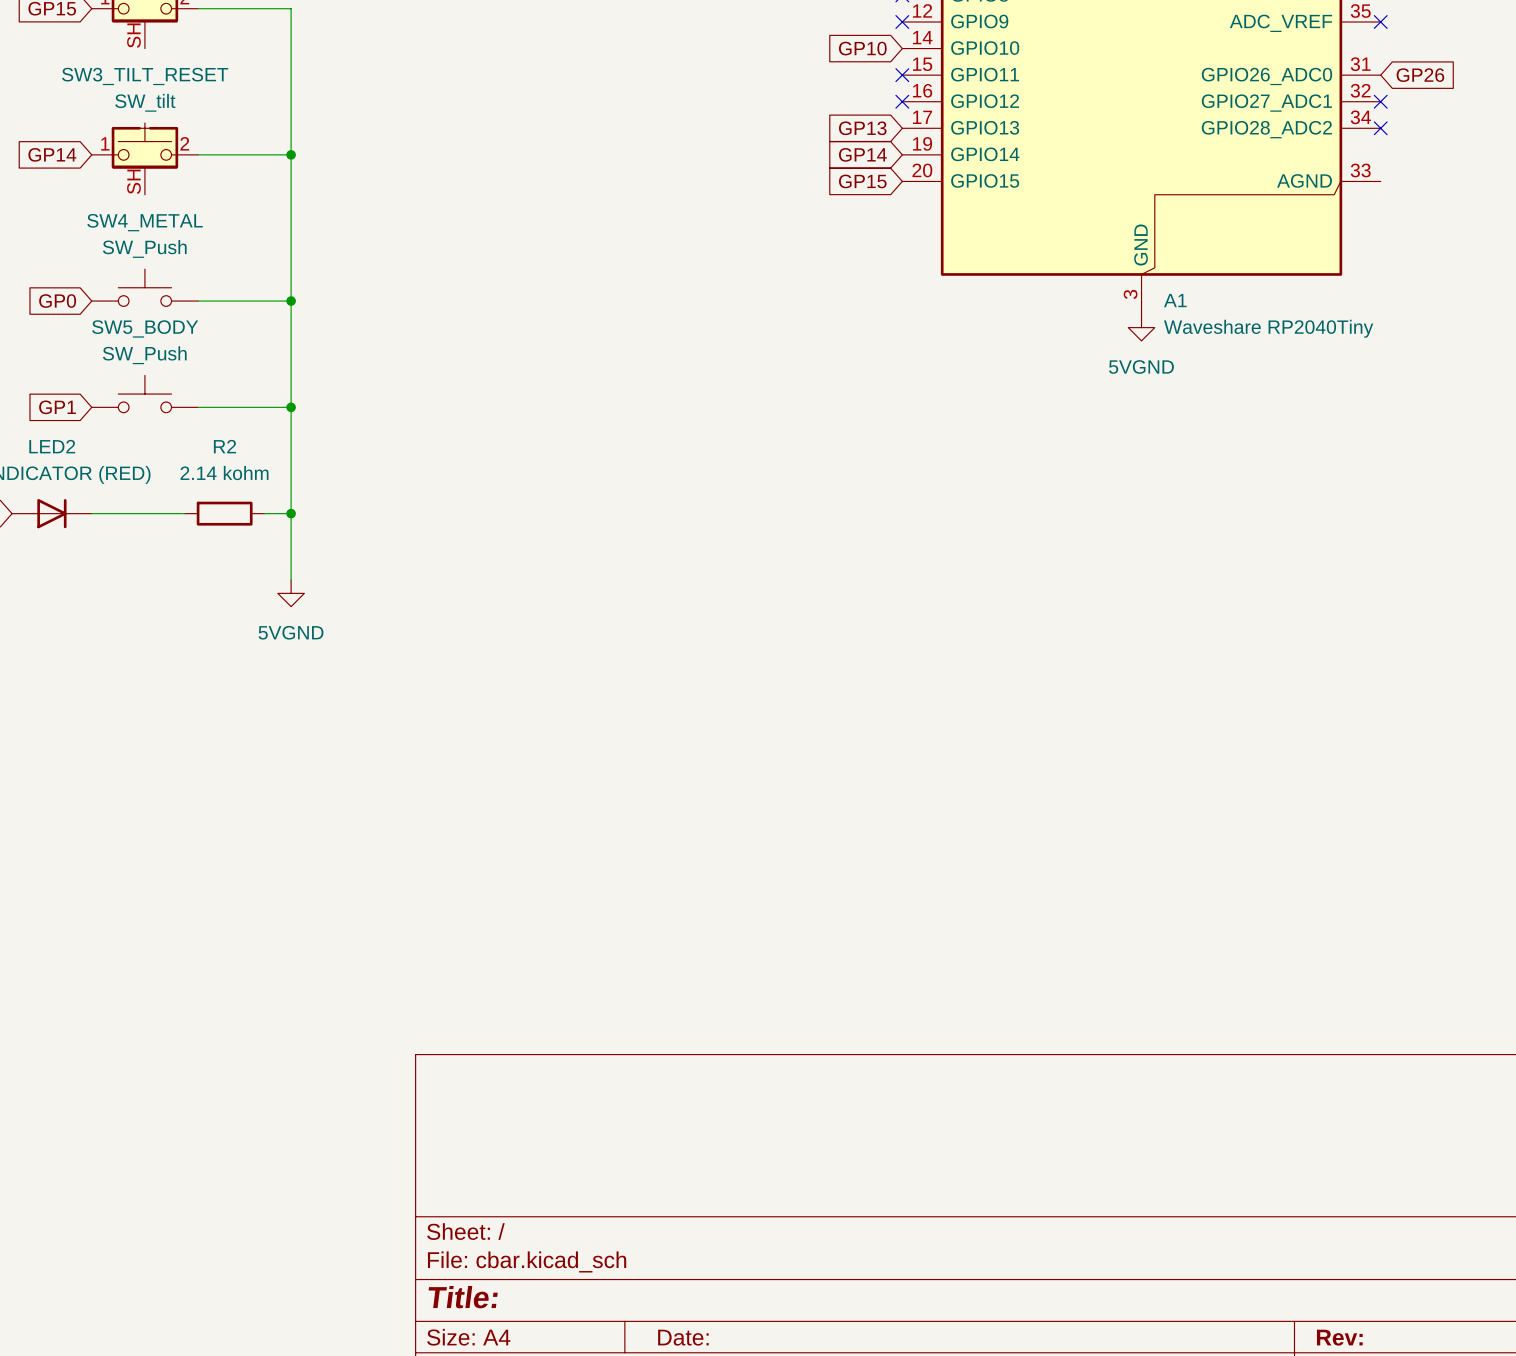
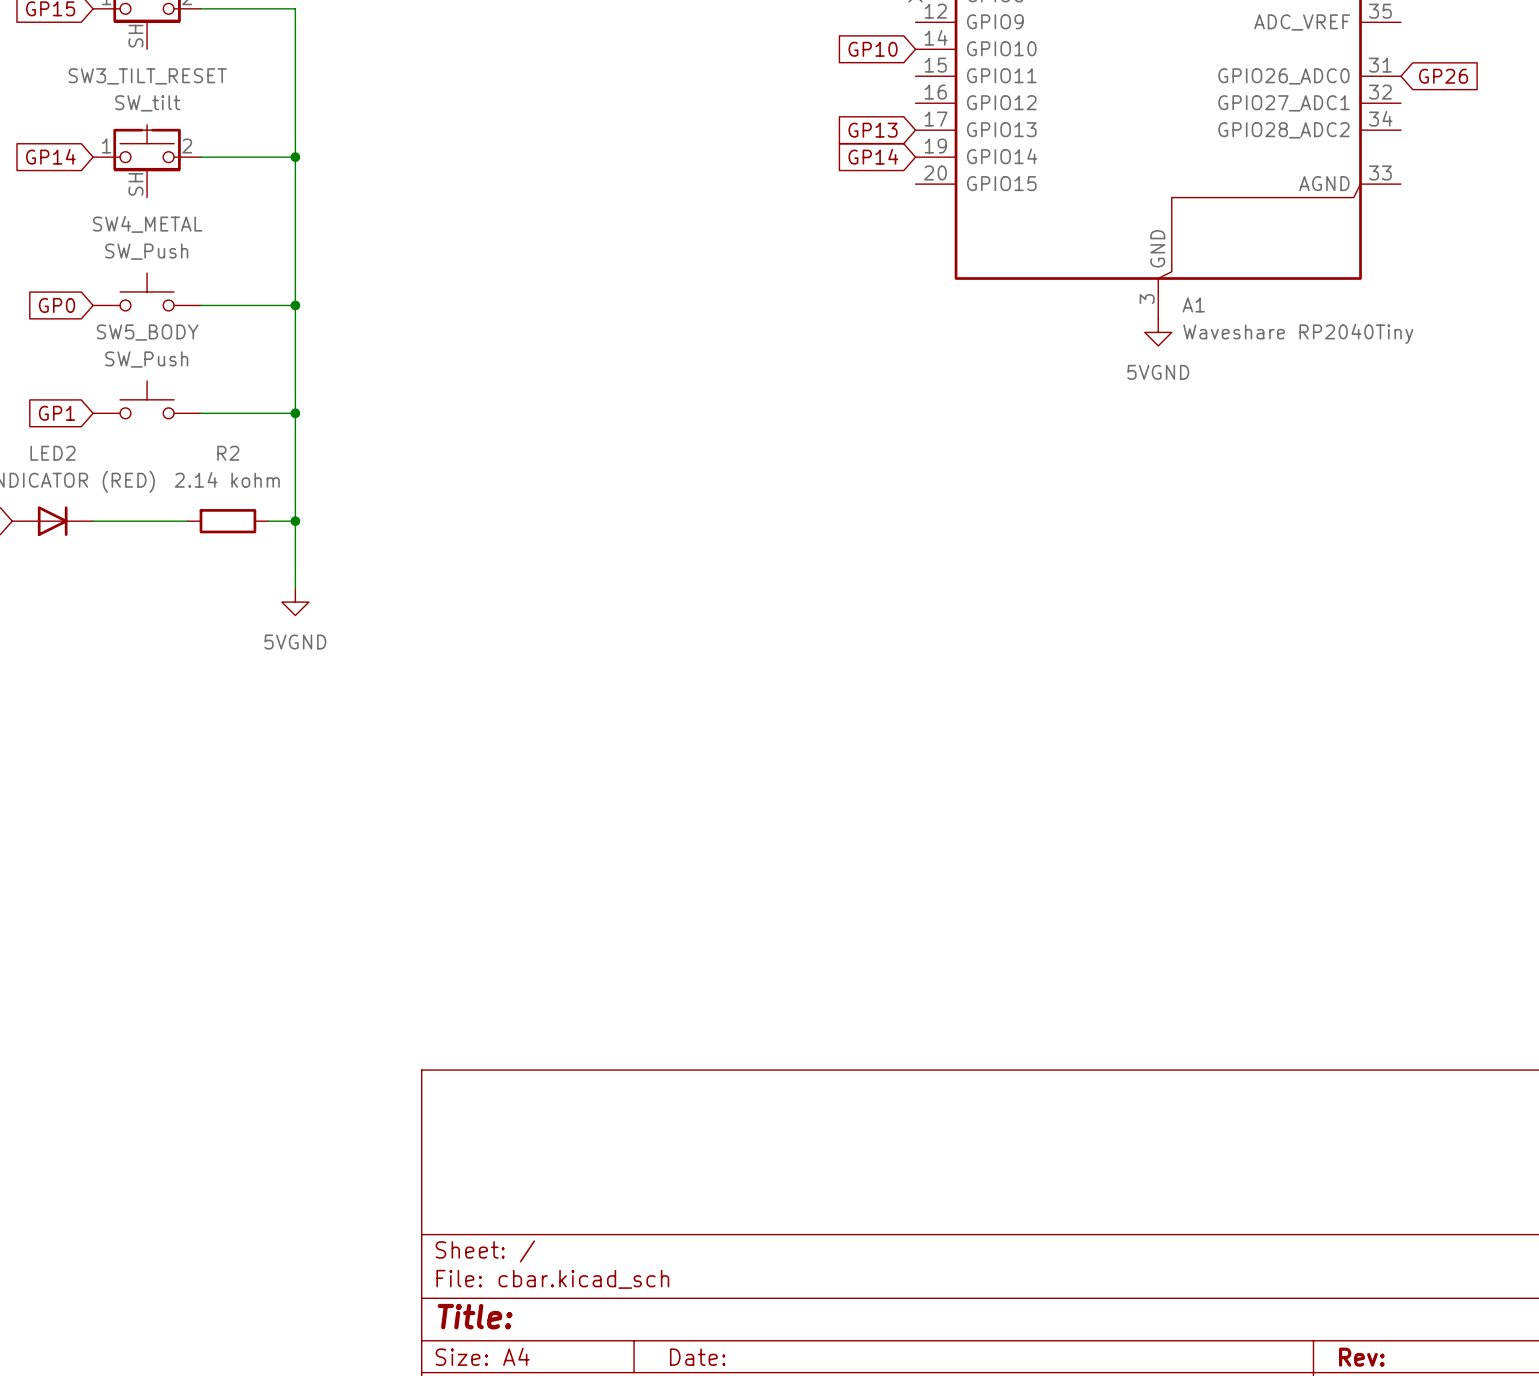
no-connect mark: (902, 21) -> none
no-connect mark: (1380, 21) -> none
no-connect mark: (902, 75) -> none
no-connect mark: (902, 101) -> none
no-connect mark: (1380, 101) -> none
no-connect mark: (1380, 128) -> none
global label: GP15 (862, 181) -> none

